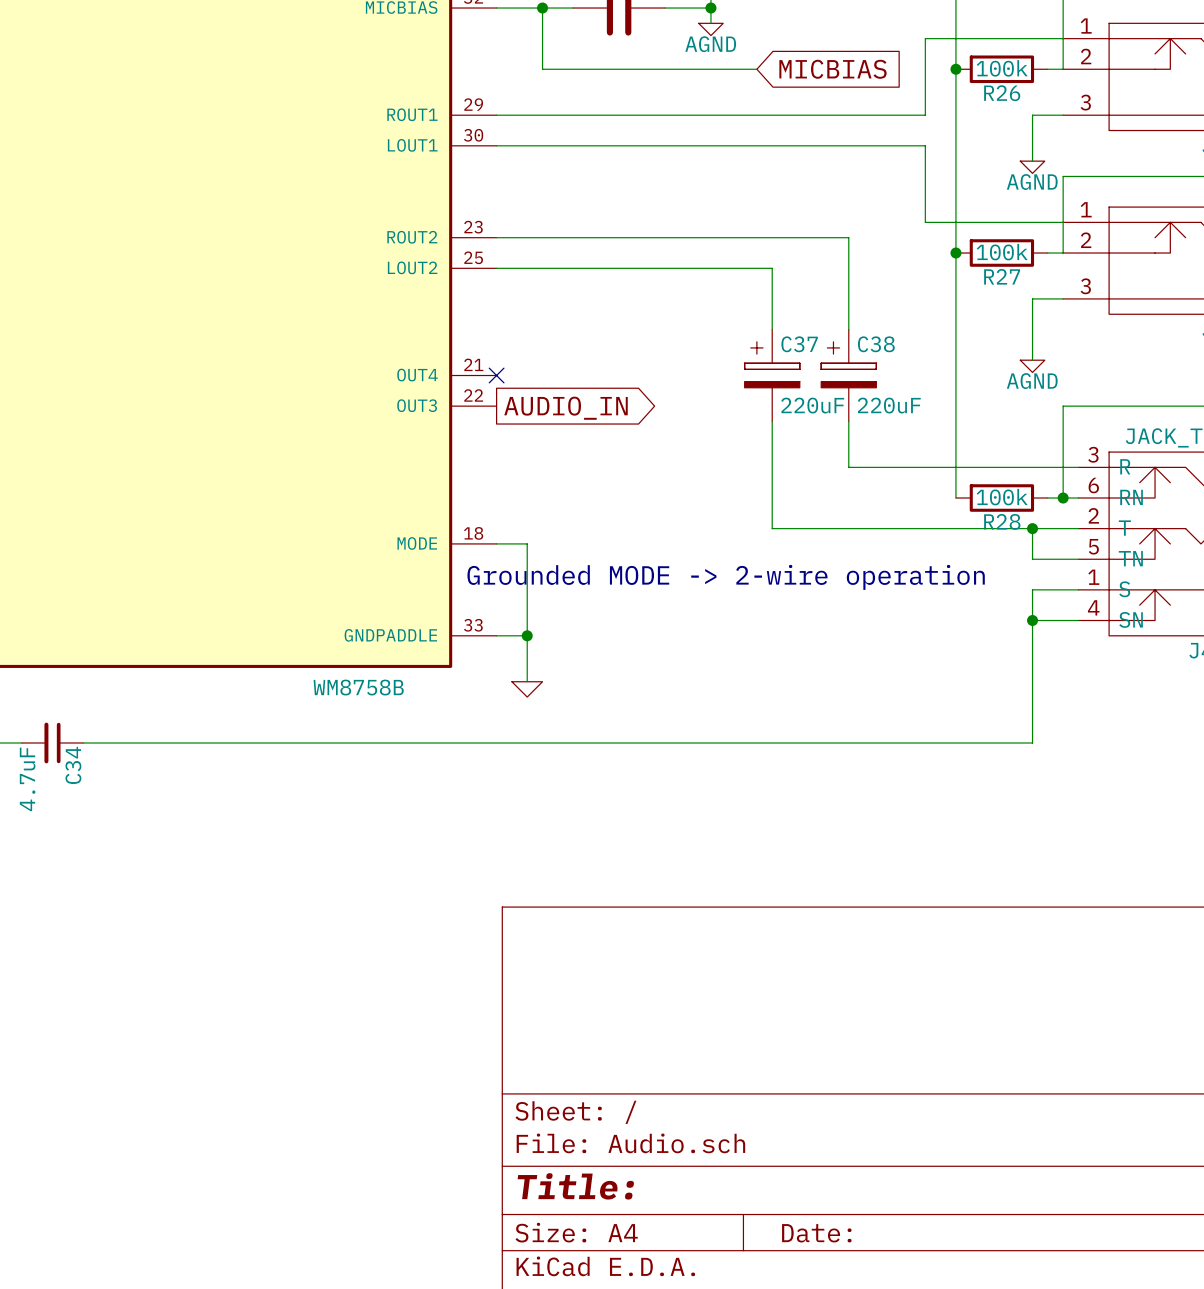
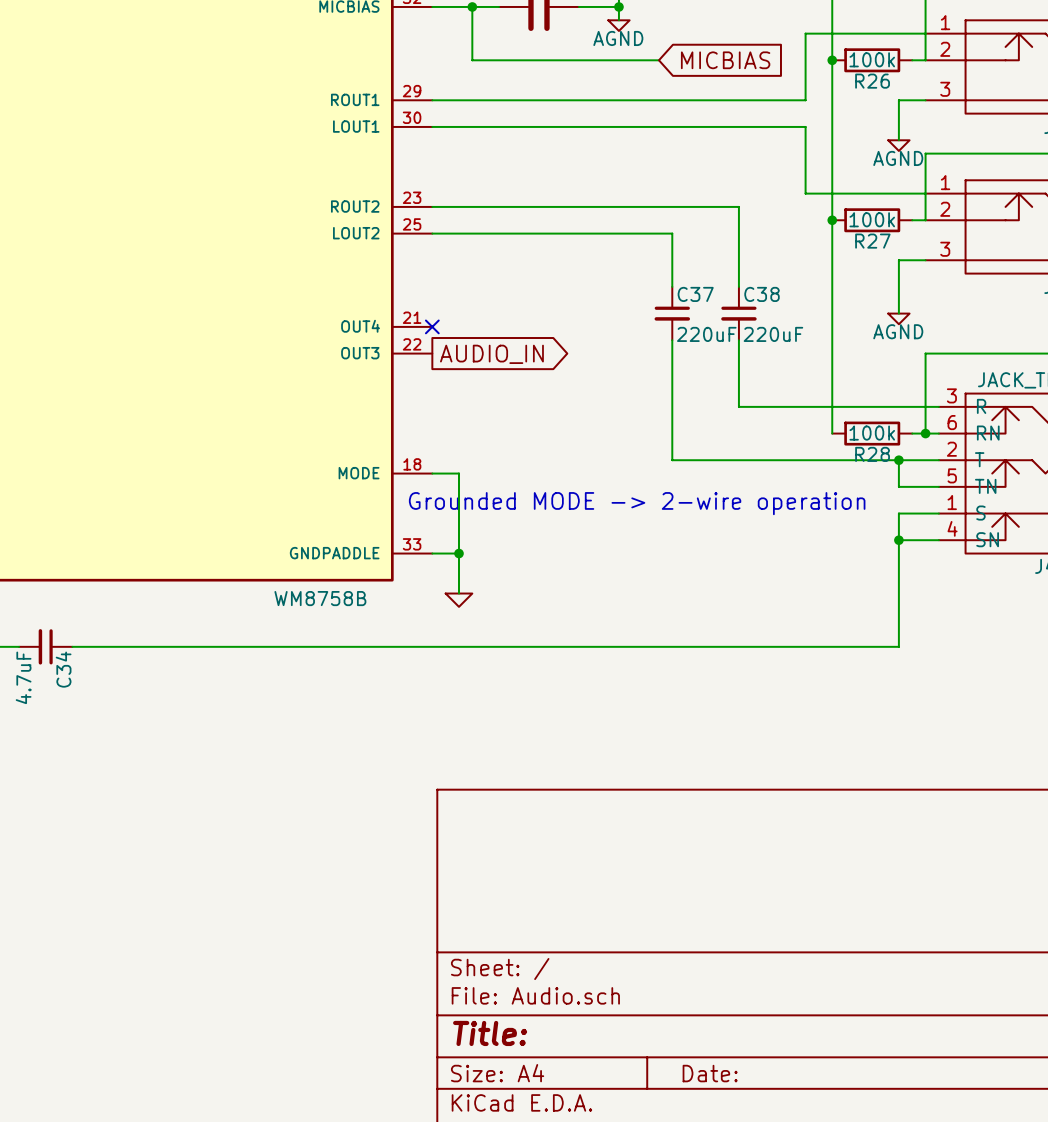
C37 symbol: [744, 329, 800, 422] -> [654, 286, 691, 341]
C38 symbol: [821, 329, 877, 422] -> [721, 286, 757, 341]

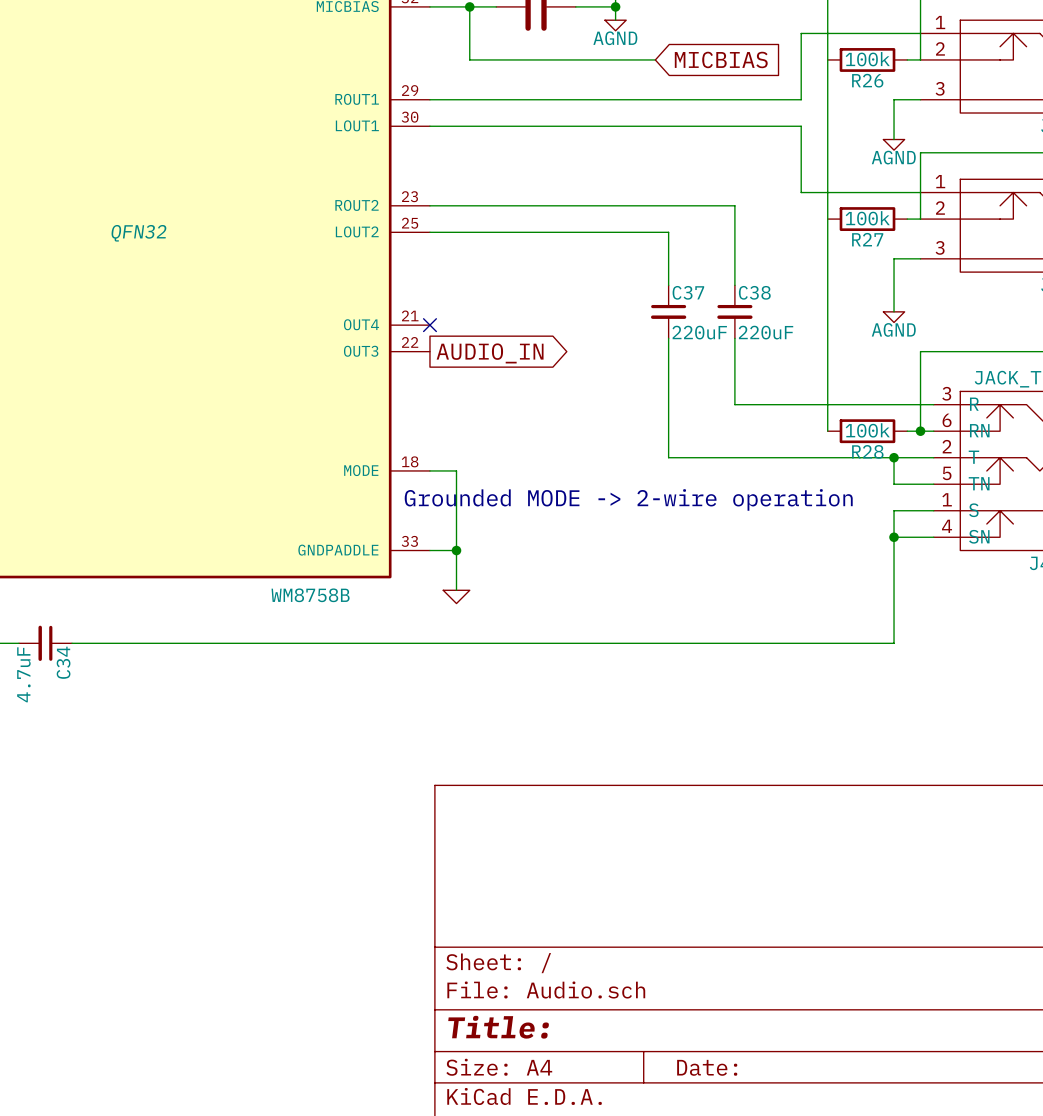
junction: (832, 60) -> none
junction: (832, 220) -> none
part text: none -> QFN32 (138, 233)

